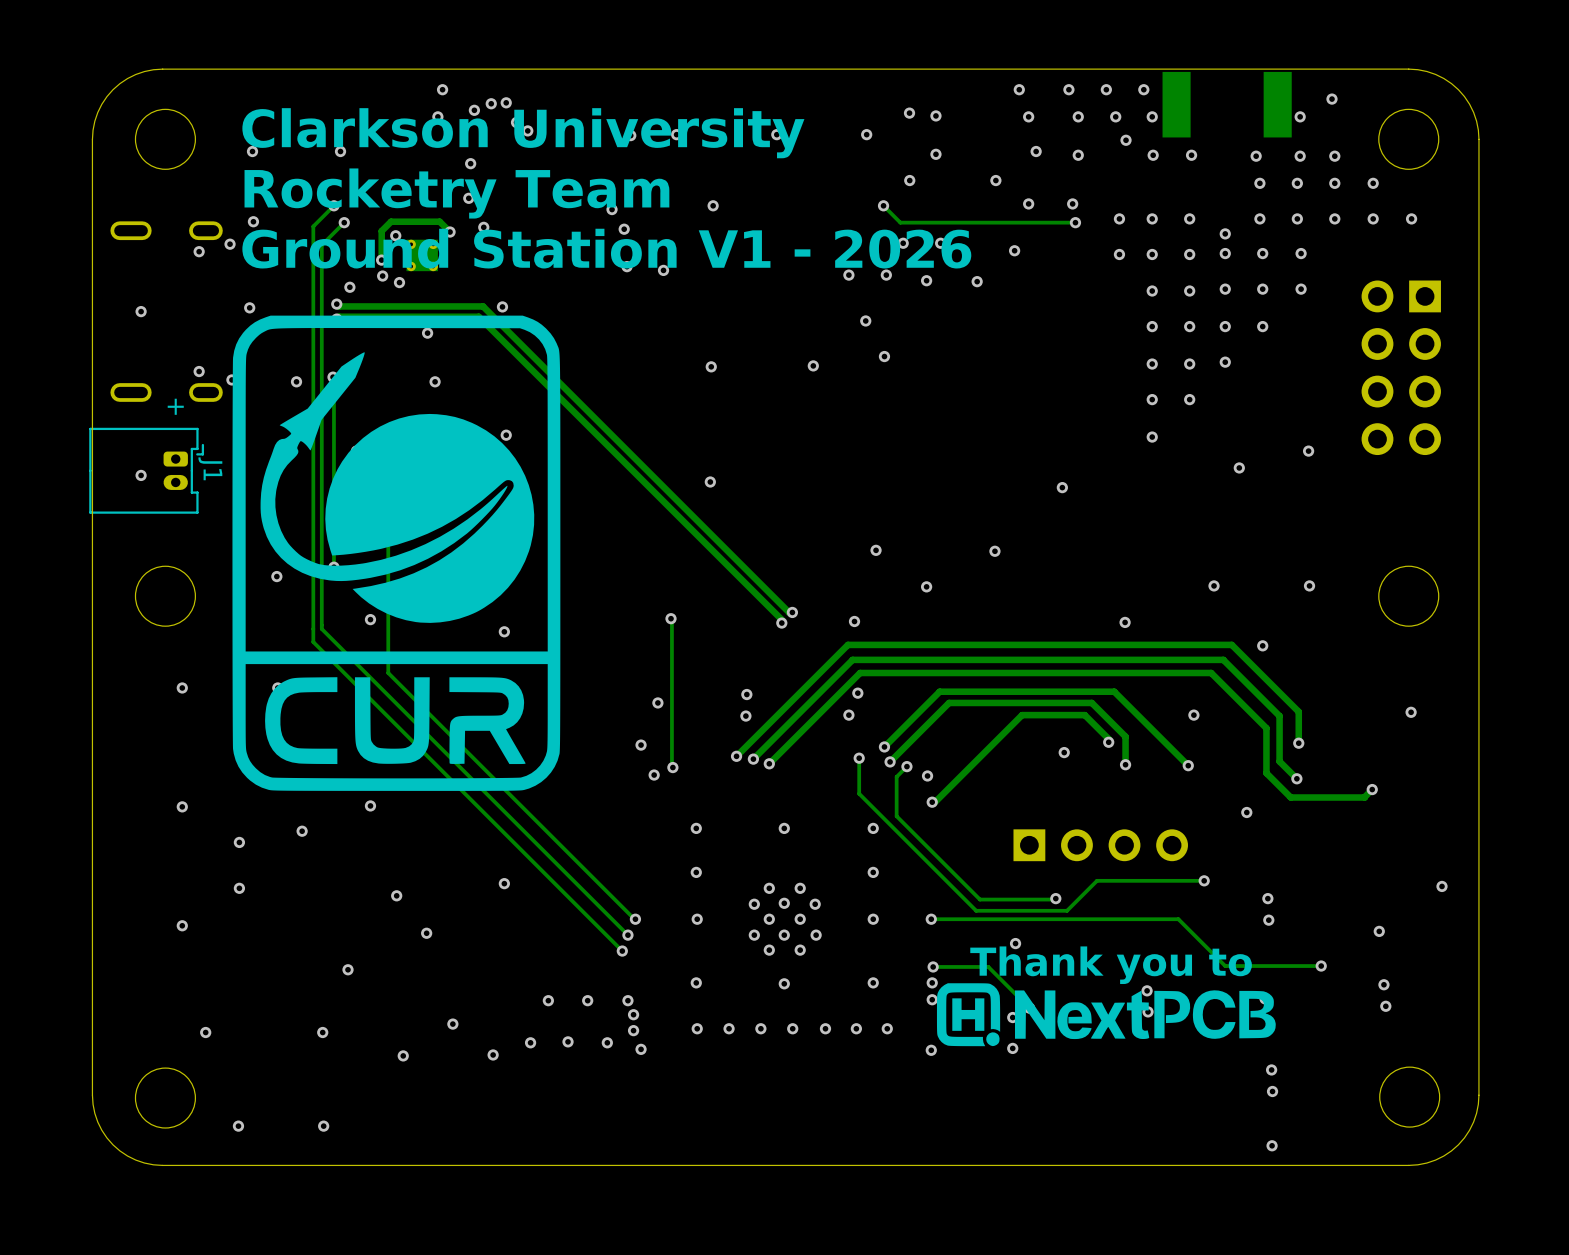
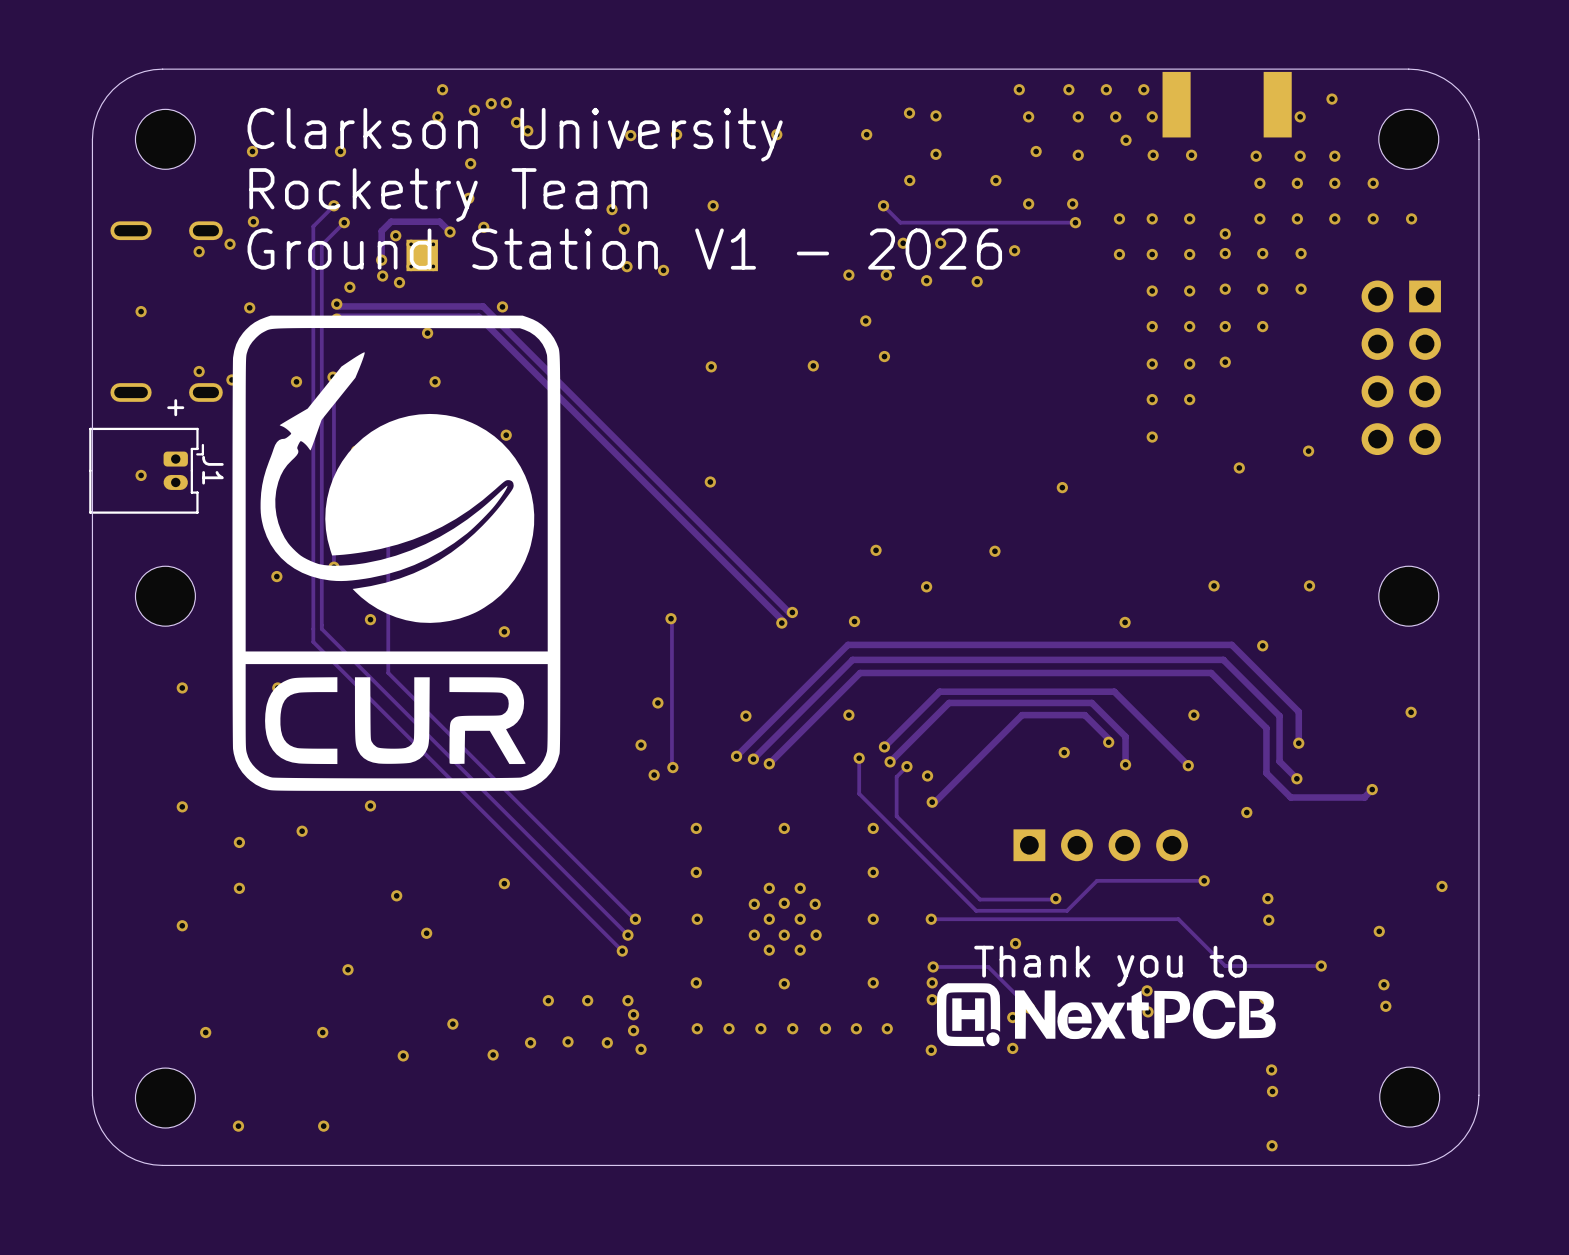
via: (857, 693) -> none
via: (746, 694) -> none

